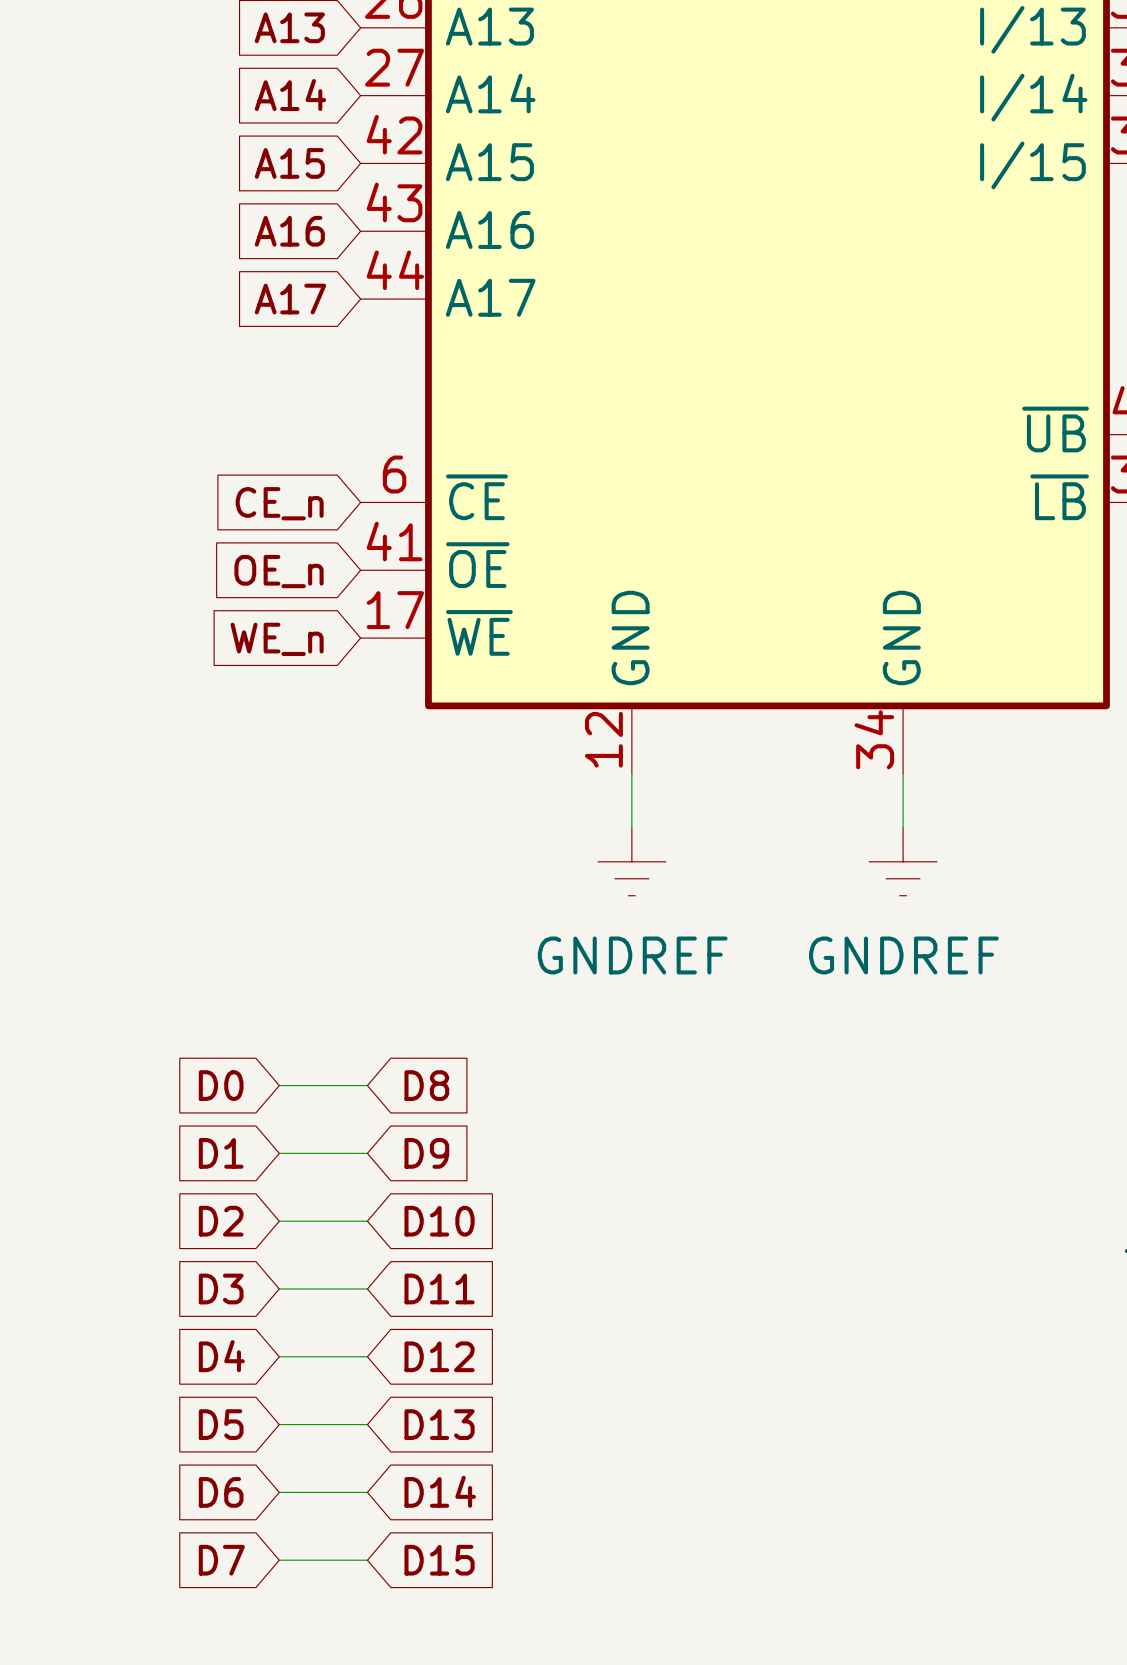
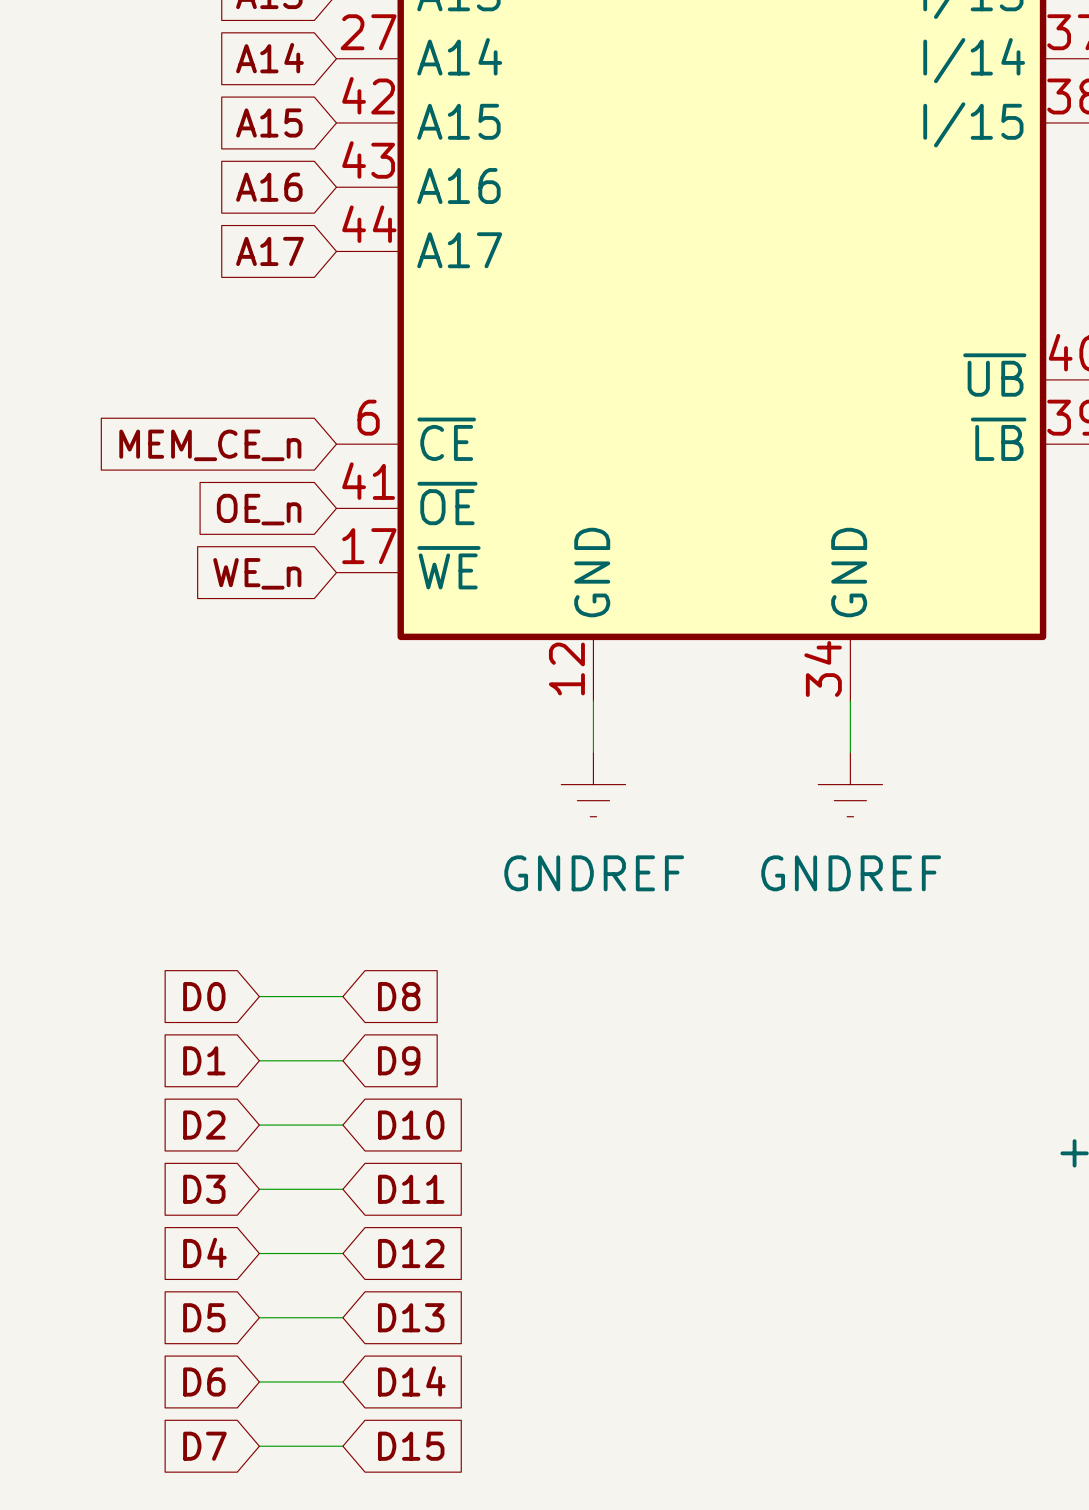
global label: CE_n (279, 503) -> MEM_CE_n (210, 445)

